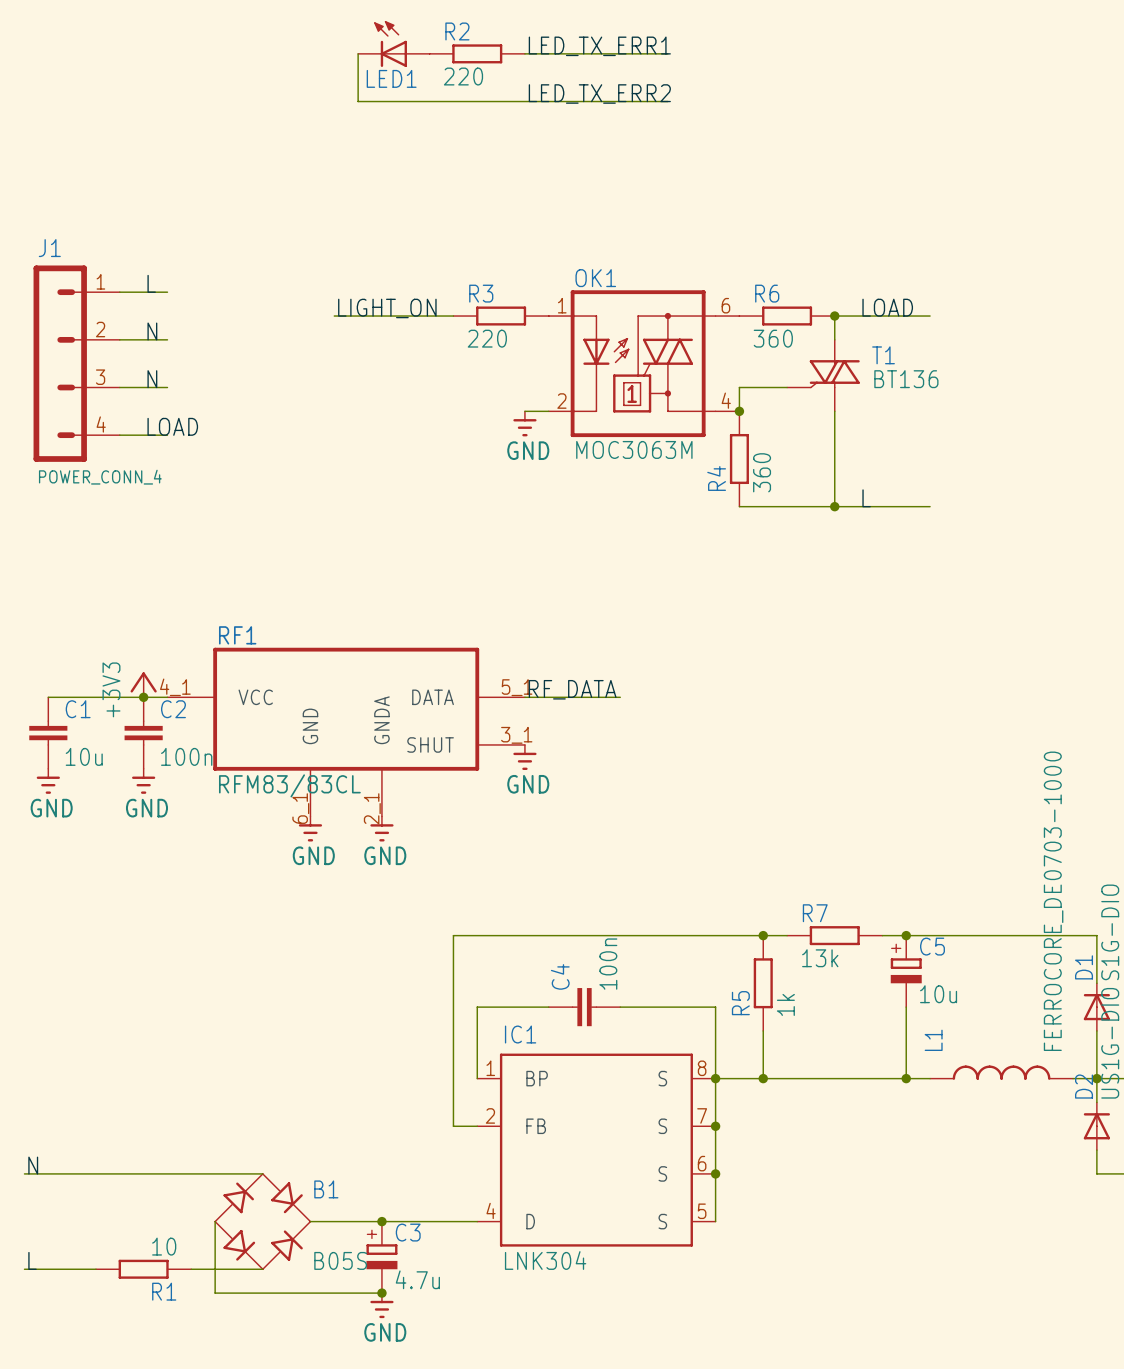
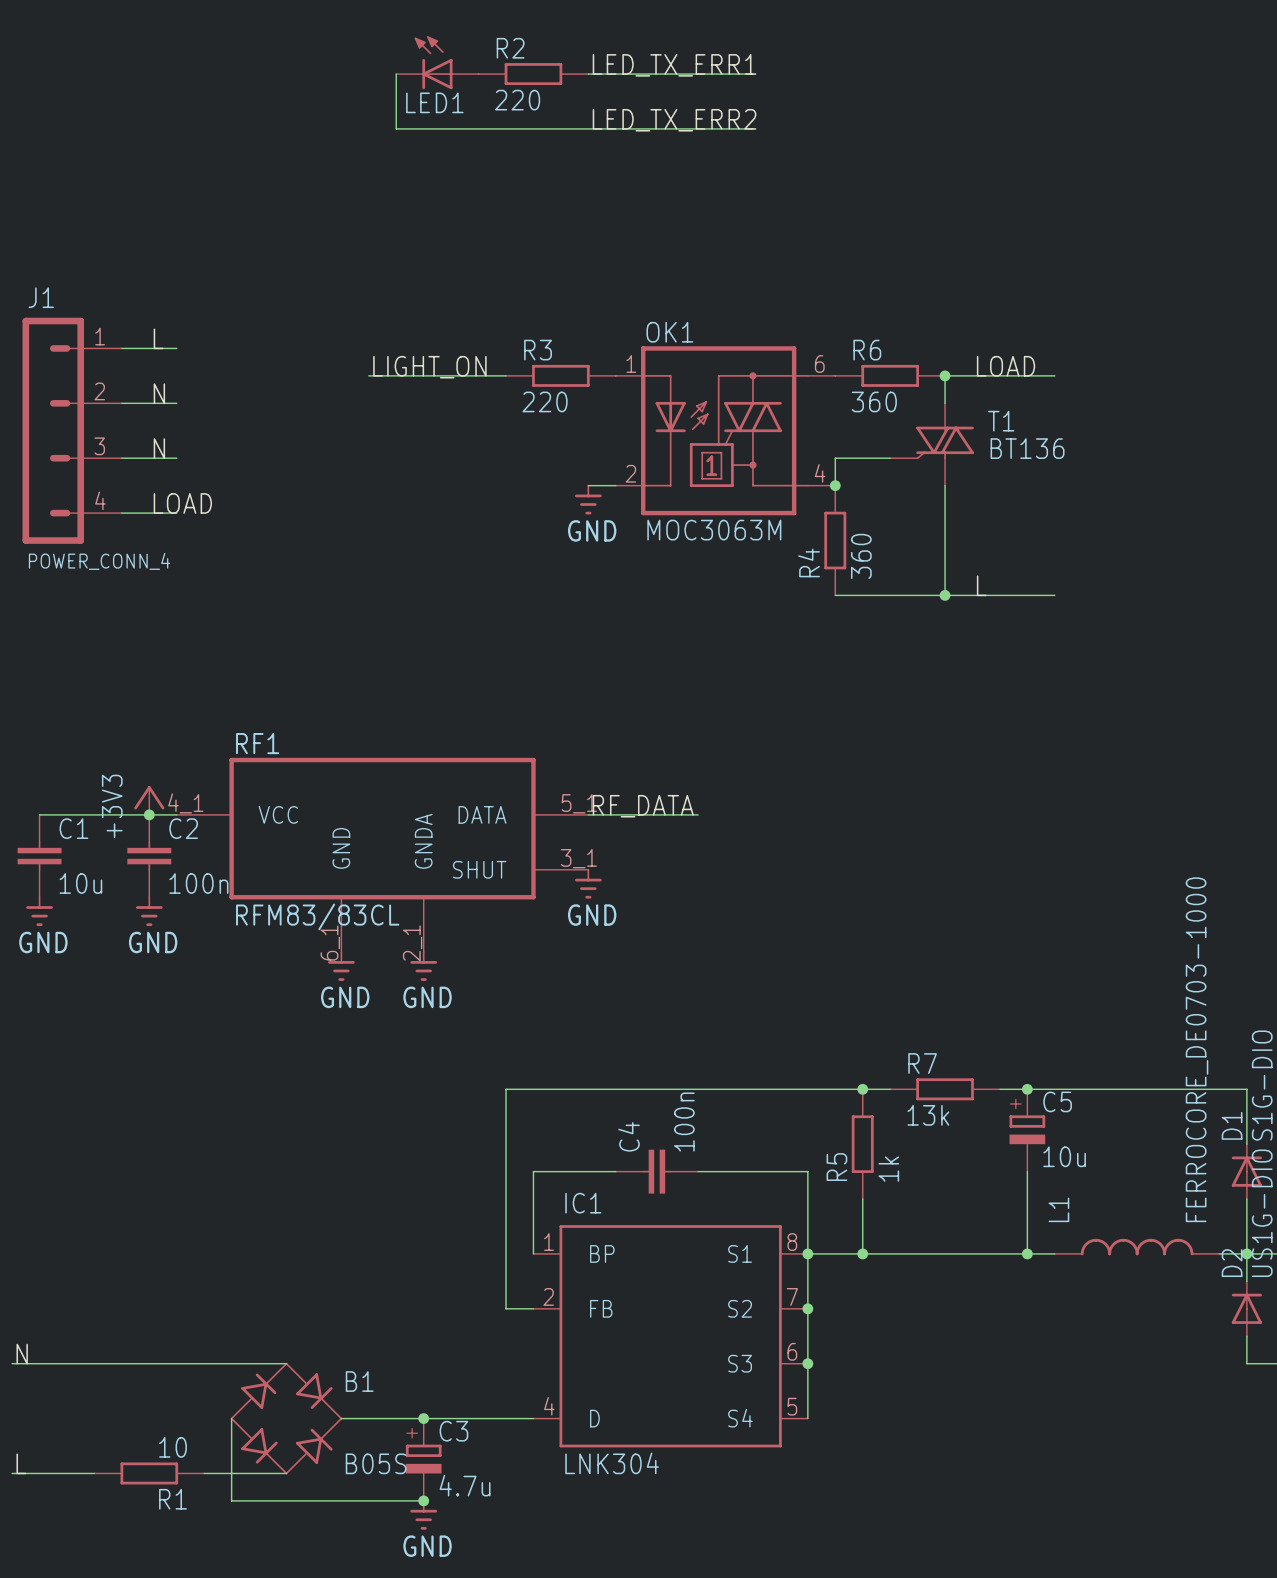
IC1 pin name: S (662, 1078) -> S1 (740, 1253)
IC1 pin name: S (662, 1126) -> S2 (740, 1308)
IC1 pin name: S (662, 1173) -> S3 (740, 1363)
IC1 pin name: S (662, 1221) -> S4 (740, 1418)

